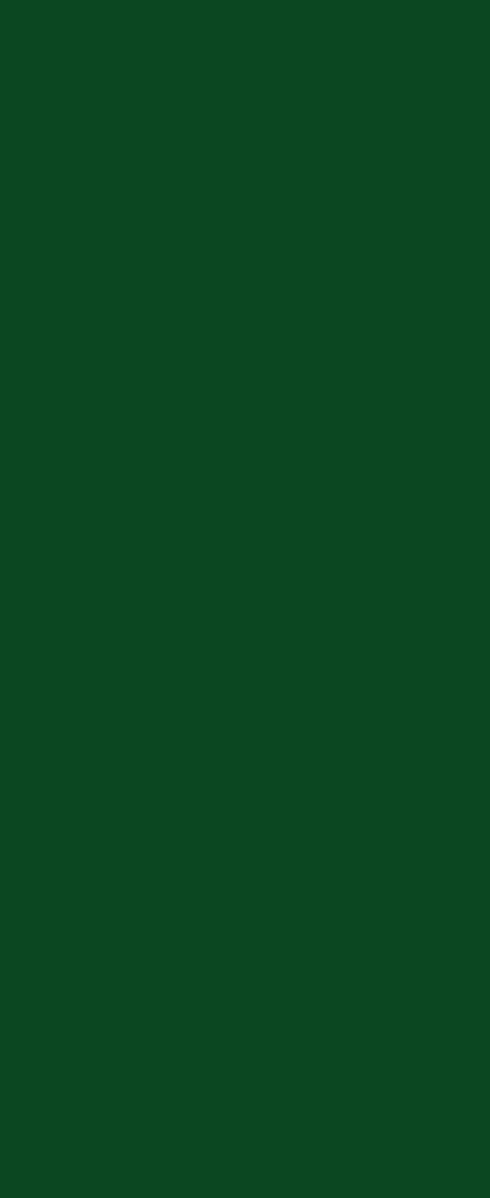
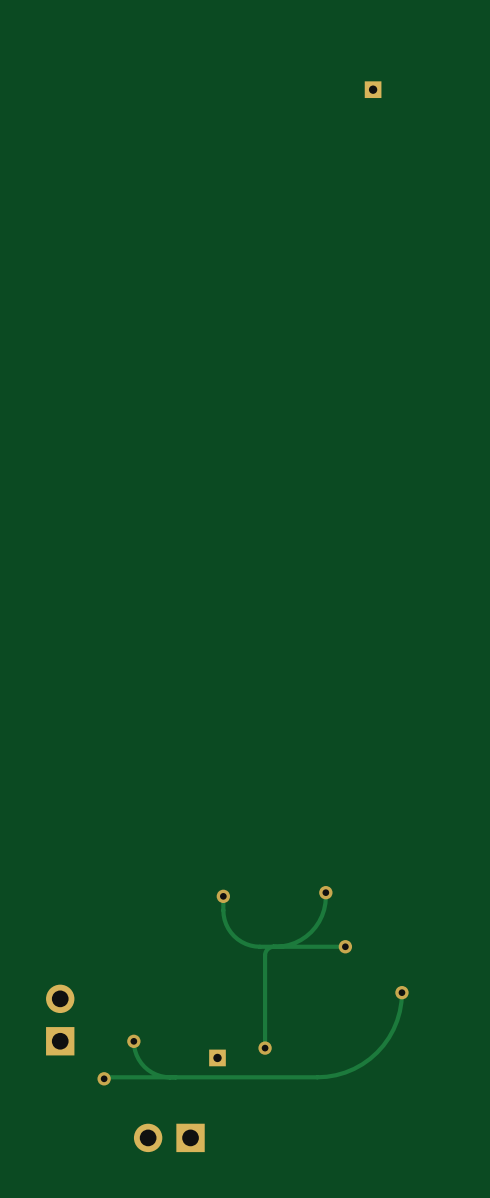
part: none -> (373, 89)
track: none -> (325, 892) (322, 915) (311, 932) (294, 942) (275, 946)
via: none -> (325, 892)
track: none -> (223, 896) (223, 915) (226, 924) (234, 936) (245, 943) (259, 946) (345, 946)
via: none -> (223, 896)
track: none -> (273, 946) (268, 948) (265, 954) (265, 1048)
via: none -> (345, 946)
track: none -> (401, 992) (399, 1011) (389, 1037) (370, 1058) (345, 1072) (317, 1077) (104, 1078)
via: none -> (401, 992)
part: none -> (60, 1020)
track: none -> (133, 1041) (136, 1055) (144, 1066) (156, 1074) (169, 1077)
via: none -> (133, 1041)
via: none -> (265, 1048)
part: none -> (217, 1057)
via: none -> (104, 1078)
part: none -> (169, 1137)

